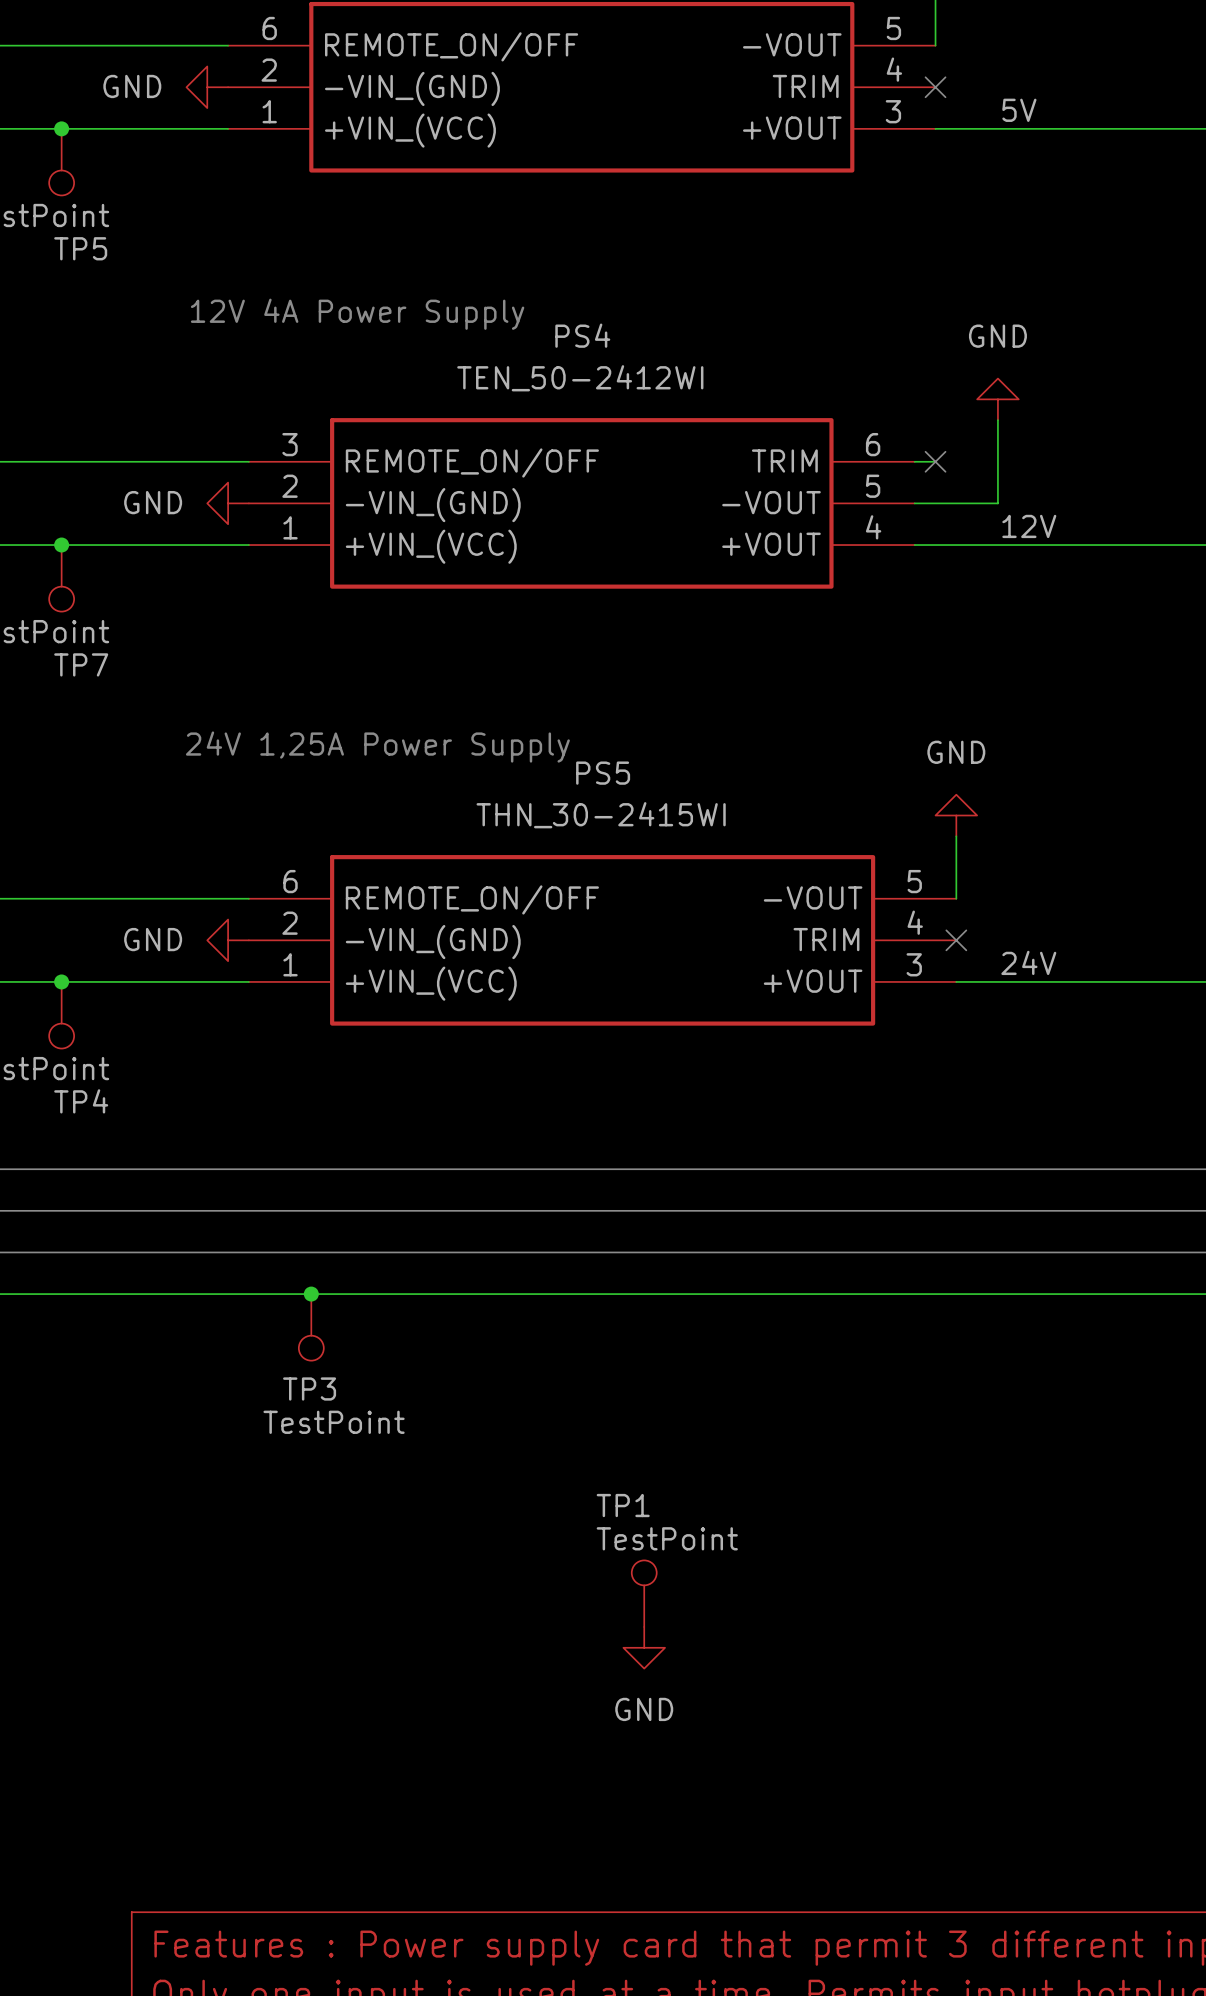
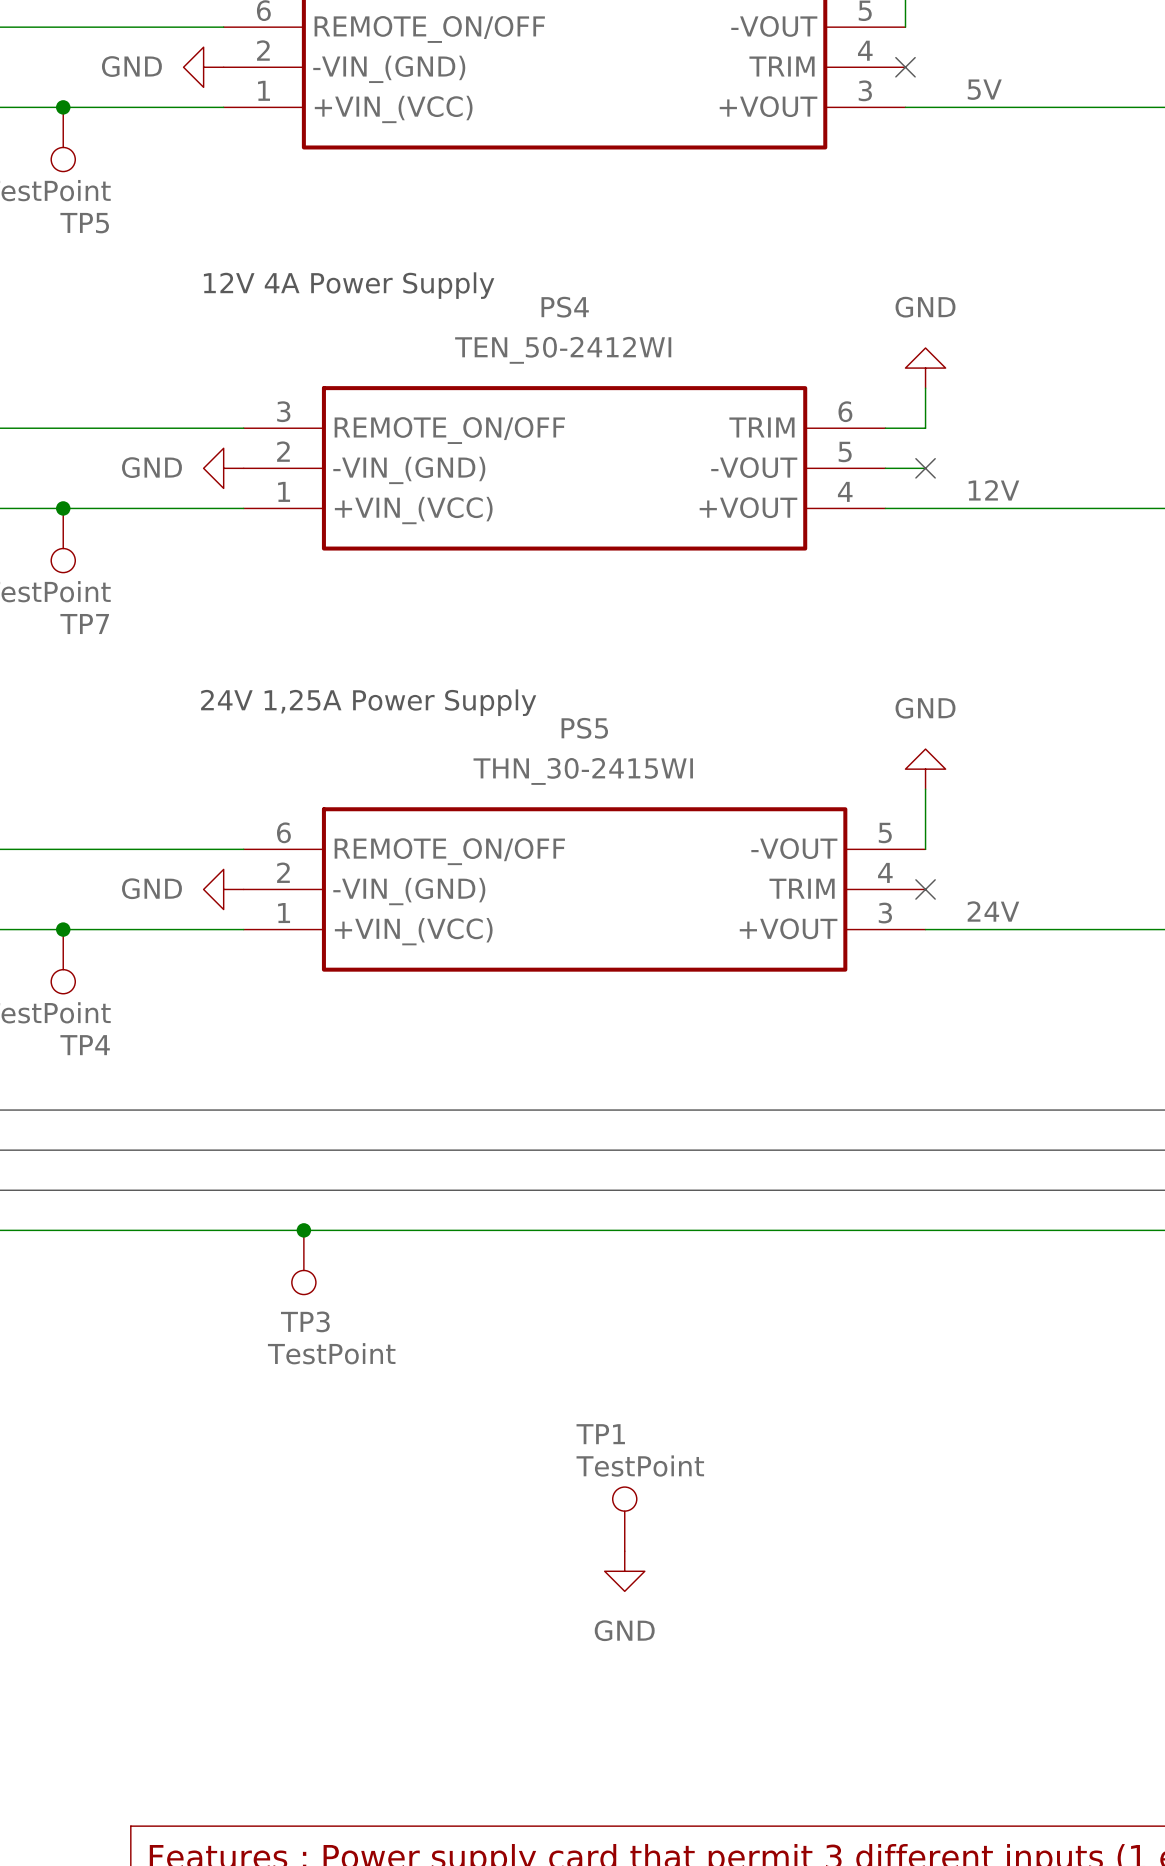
power symbol position: GND (997, 399) -> GND (925, 368)
wire: none -> (925, 388) (925, 428) (905, 428)
wire: (997, 420) (997, 503) (956, 503) -> none
no-connect mark position: (935, 461) -> (925, 468)

